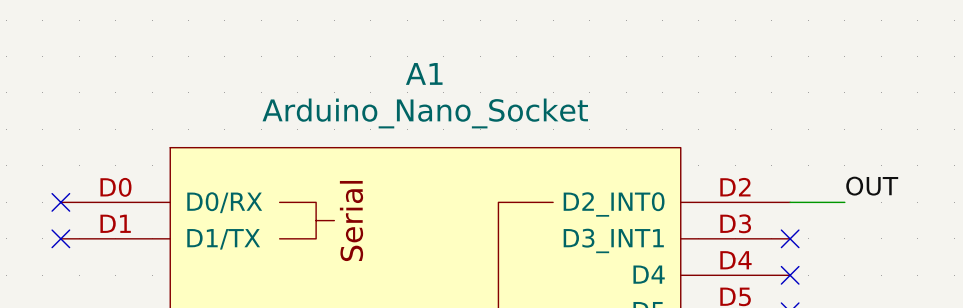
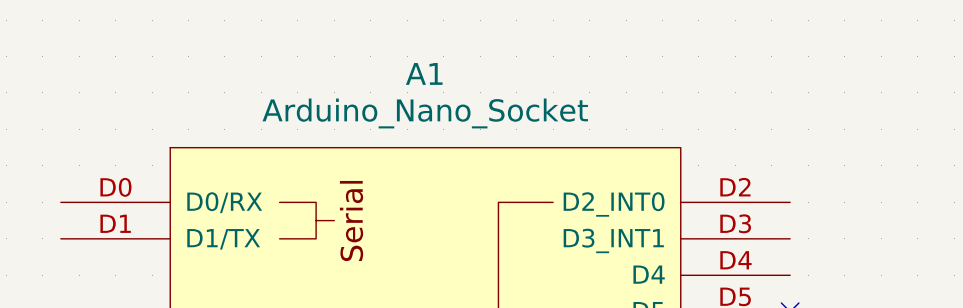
label: OUT (872, 186) -> none
no-connect mark: (60, 202) -> none
wire: (790, 202) (844, 202) -> none
no-connect mark: (60, 238) -> none
no-connect mark: (790, 238) -> none
no-connect mark: (790, 275) -> none

